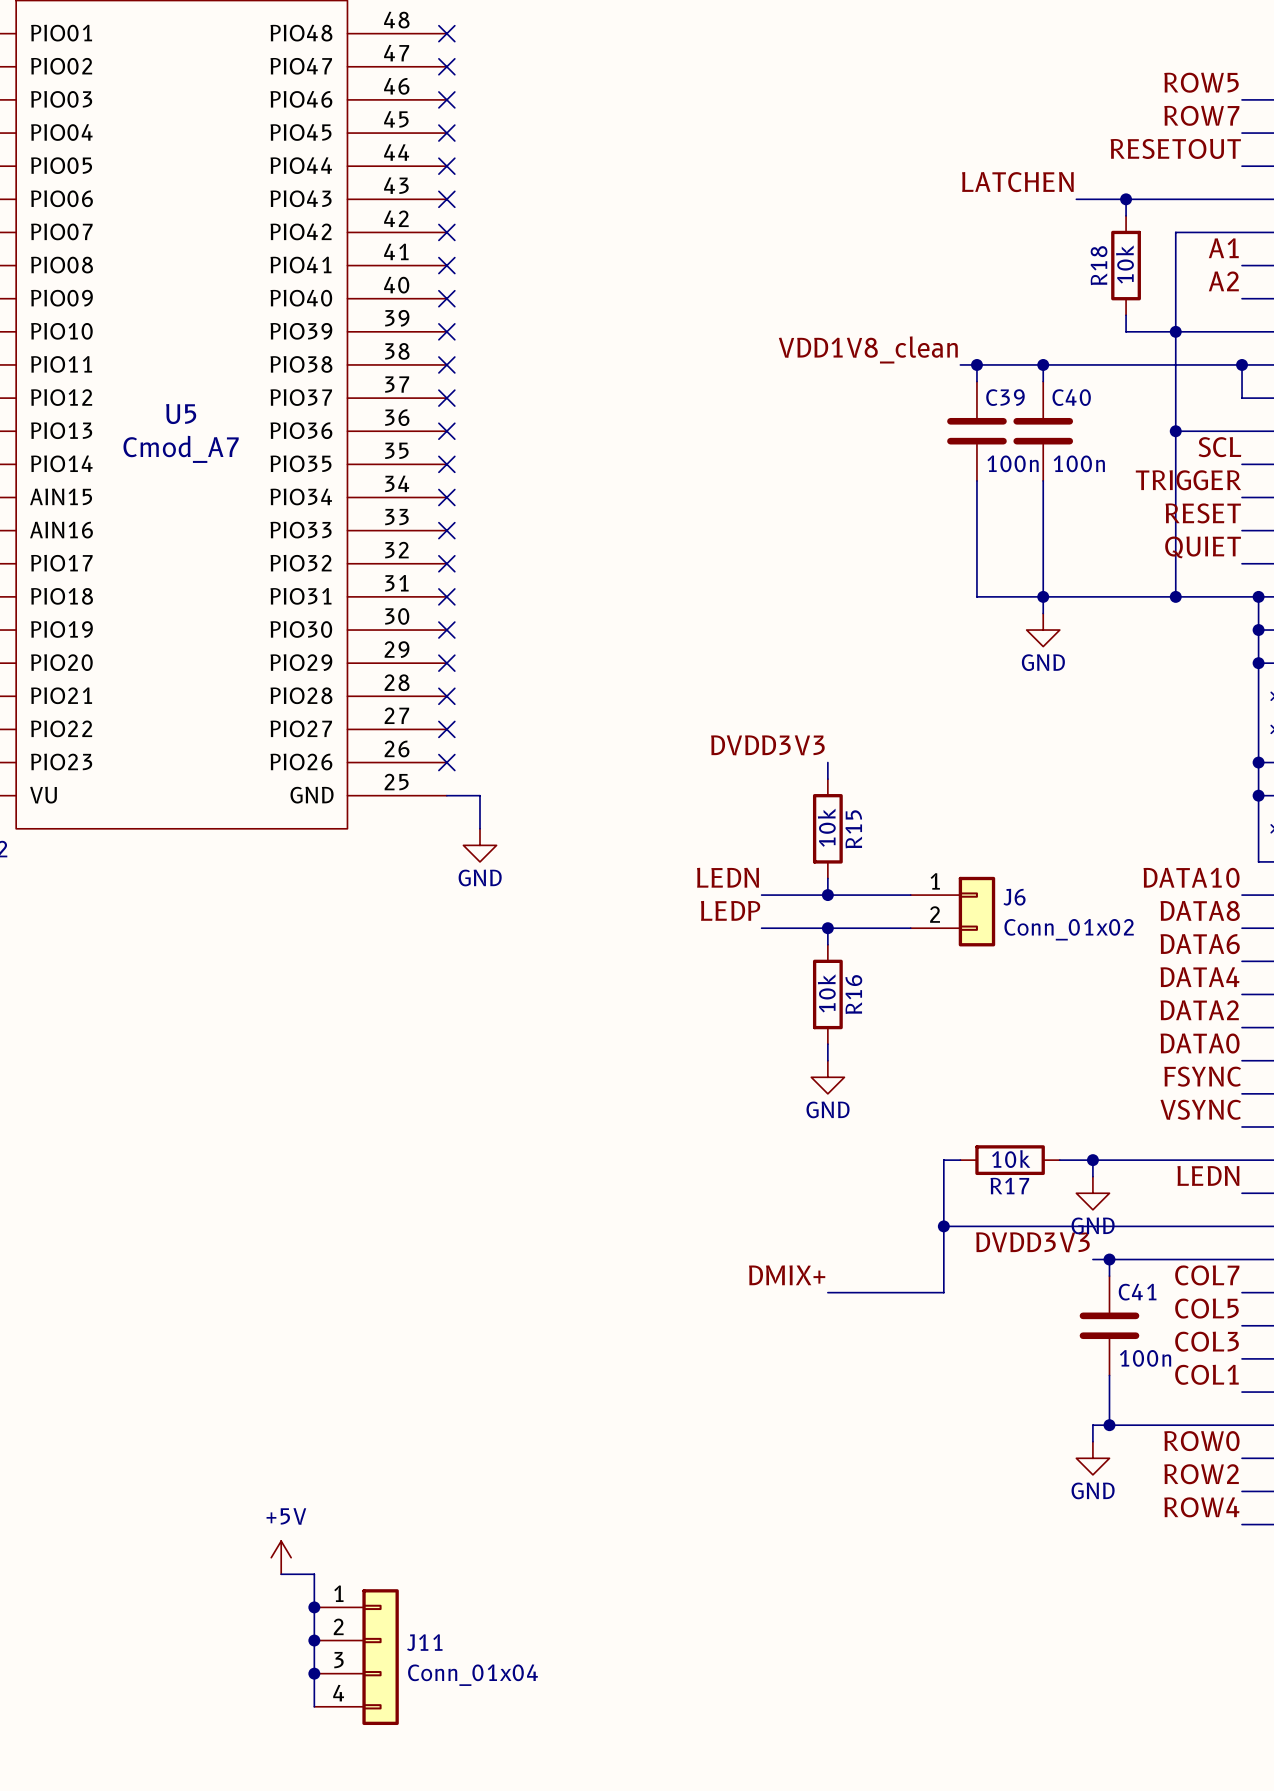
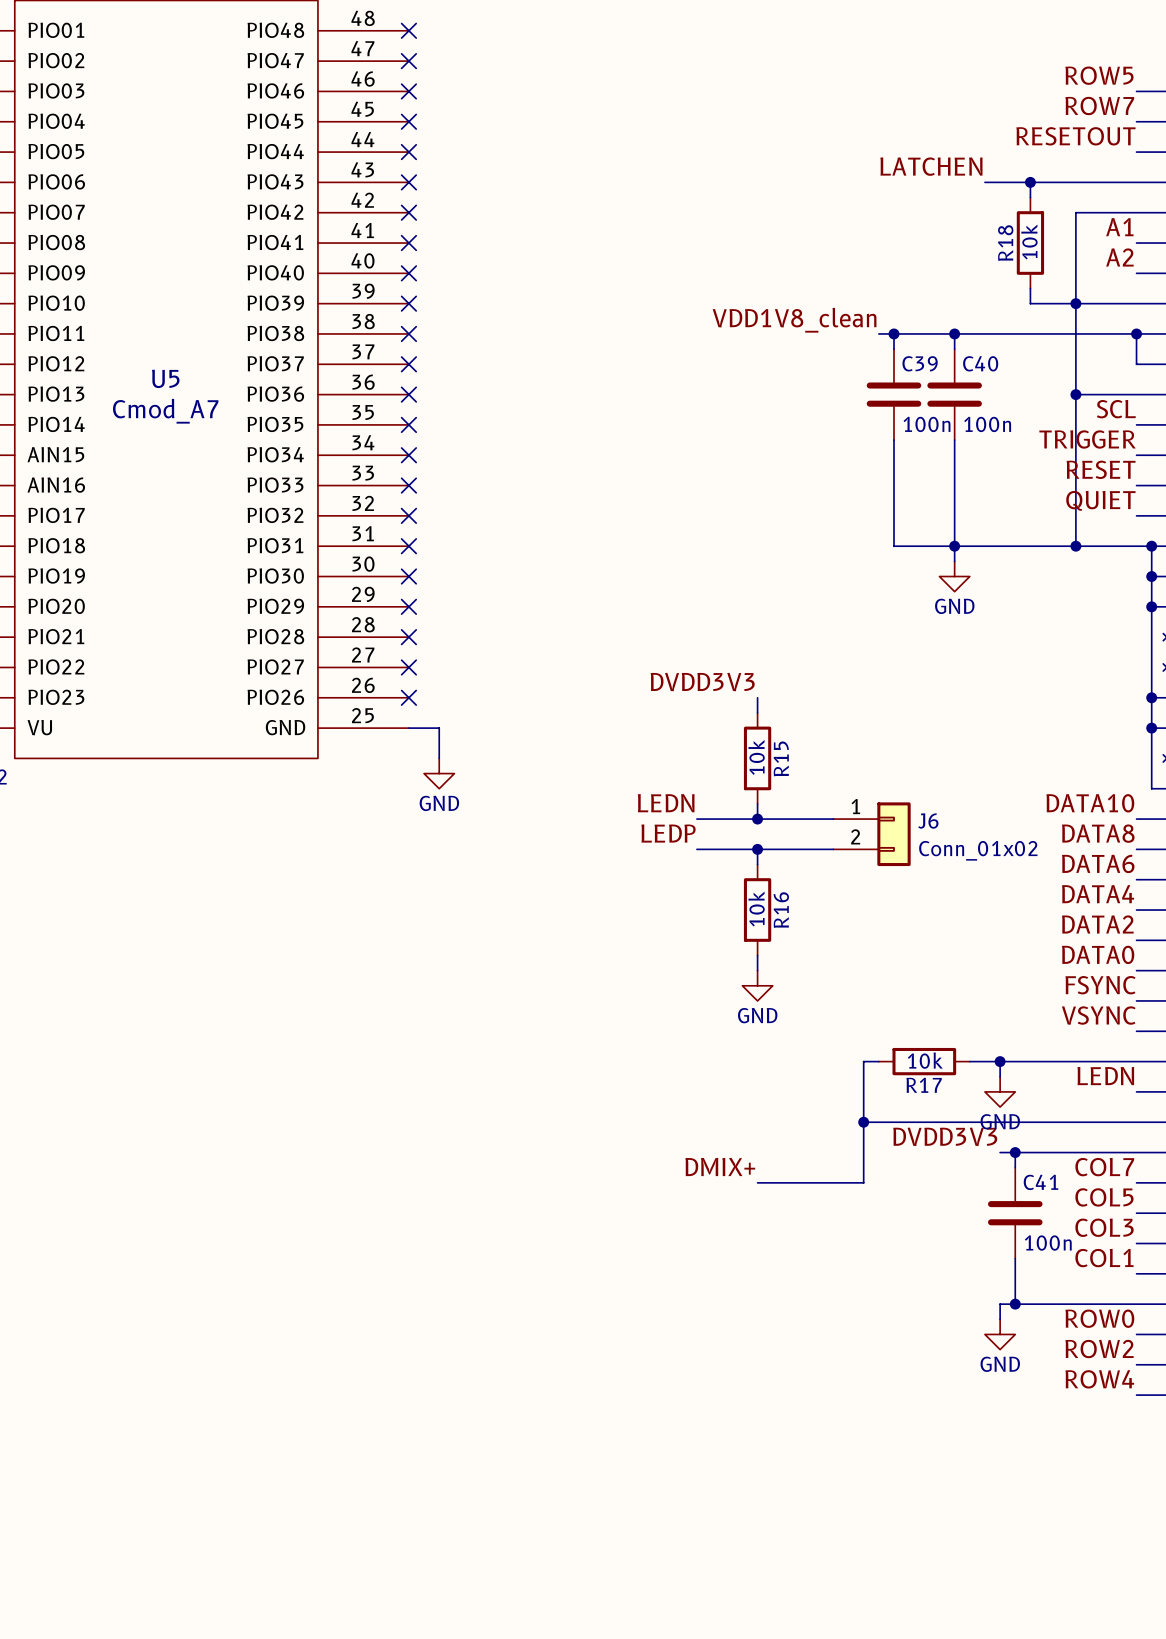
power symbol: +5V (281, 1557) -> none
wire: (281, 1574) (314, 1574) (314, 1706) -> none
junction: (314, 1607) -> none
junction: (314, 1640) -> none
J11: Conn_01x04 (356, 1657) -> none
junction: (314, 1673) -> none

